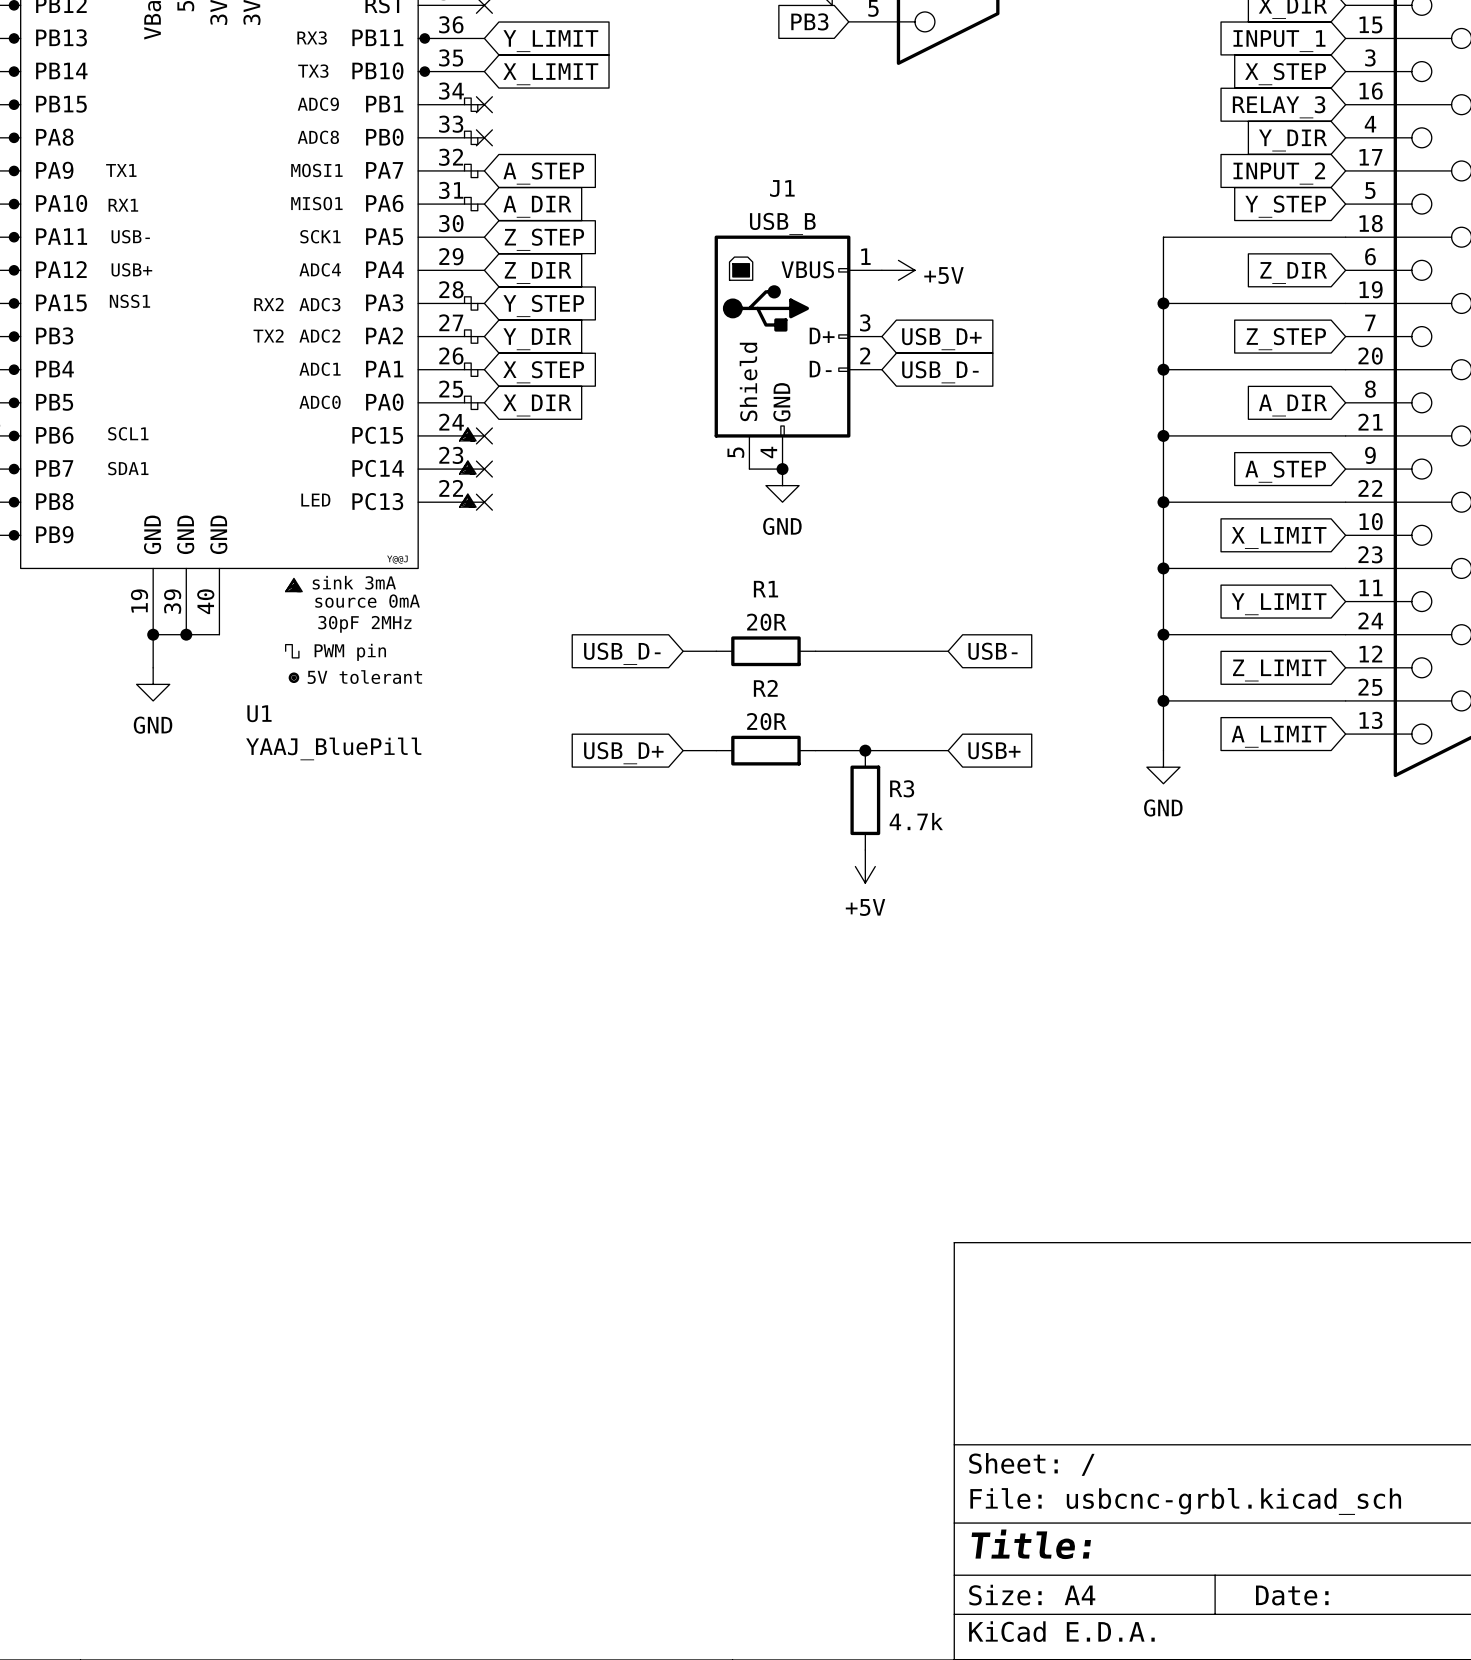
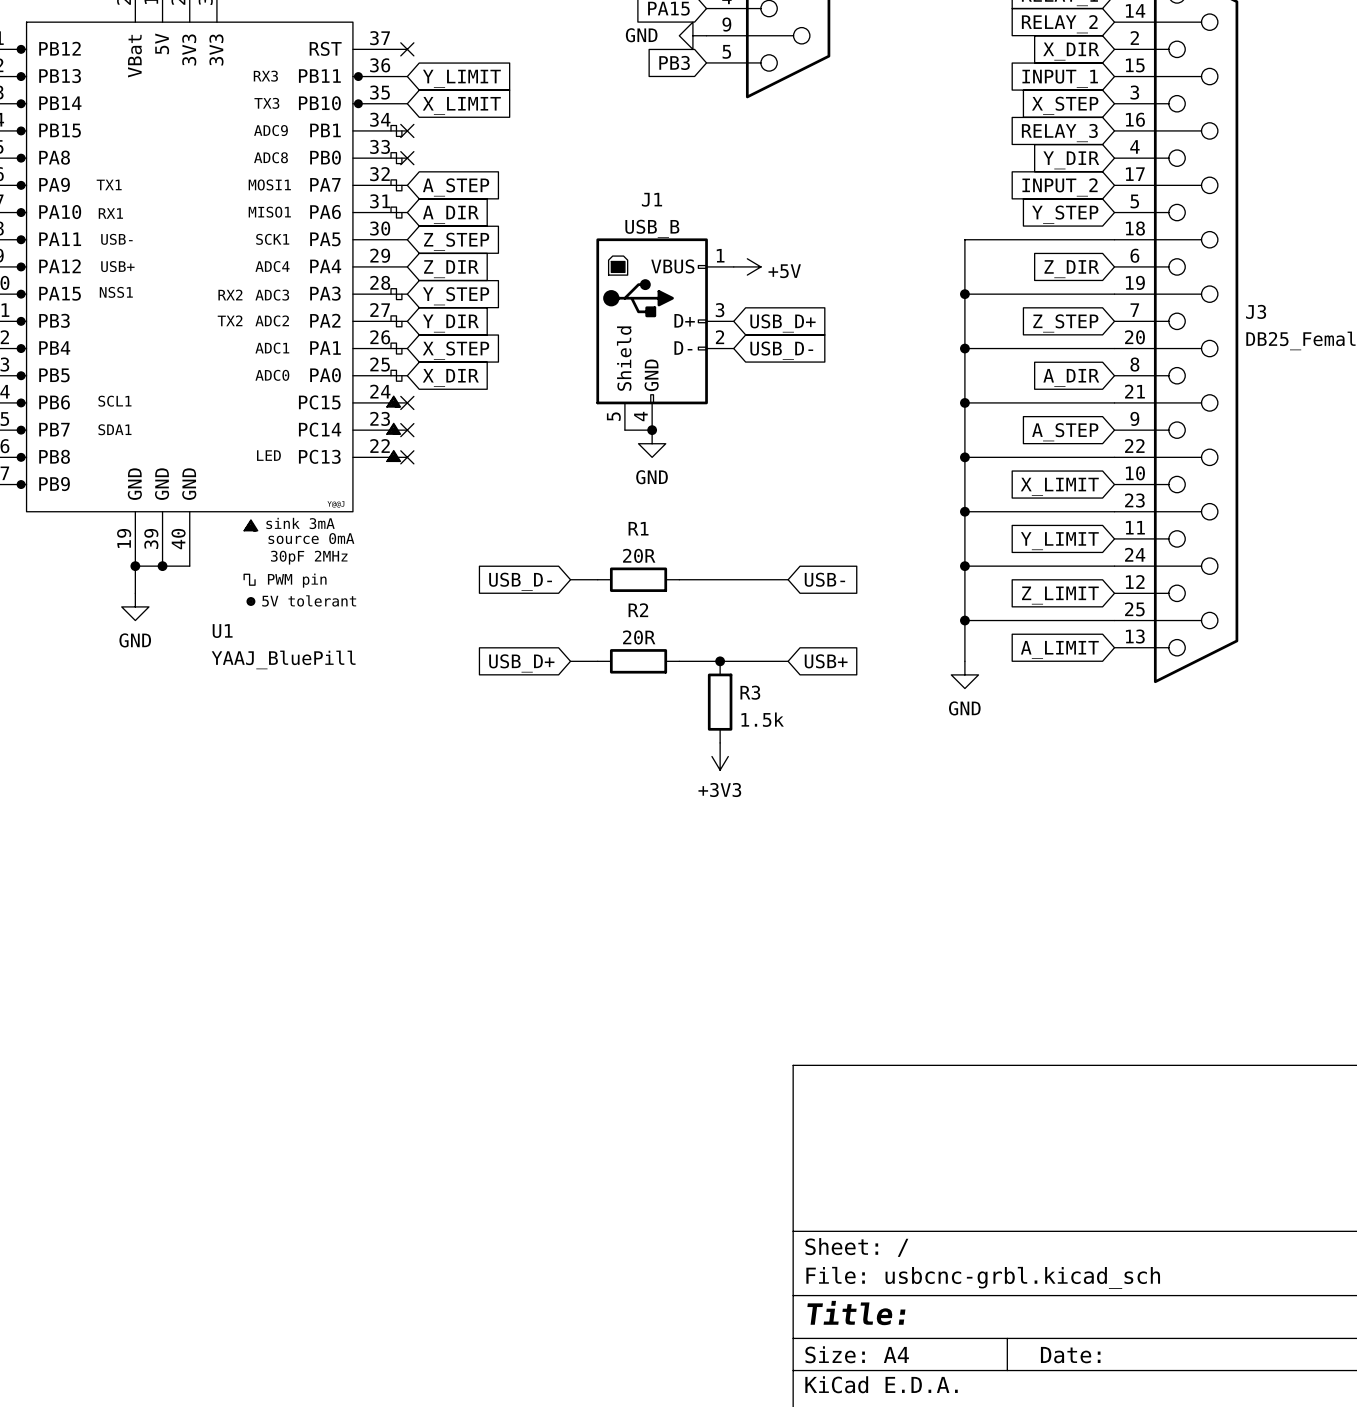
R3 value: 4.7k (916, 821) -> 1.5k (762, 719)
power symbol: +5V (865, 866) -> +3V3 (720, 756)

